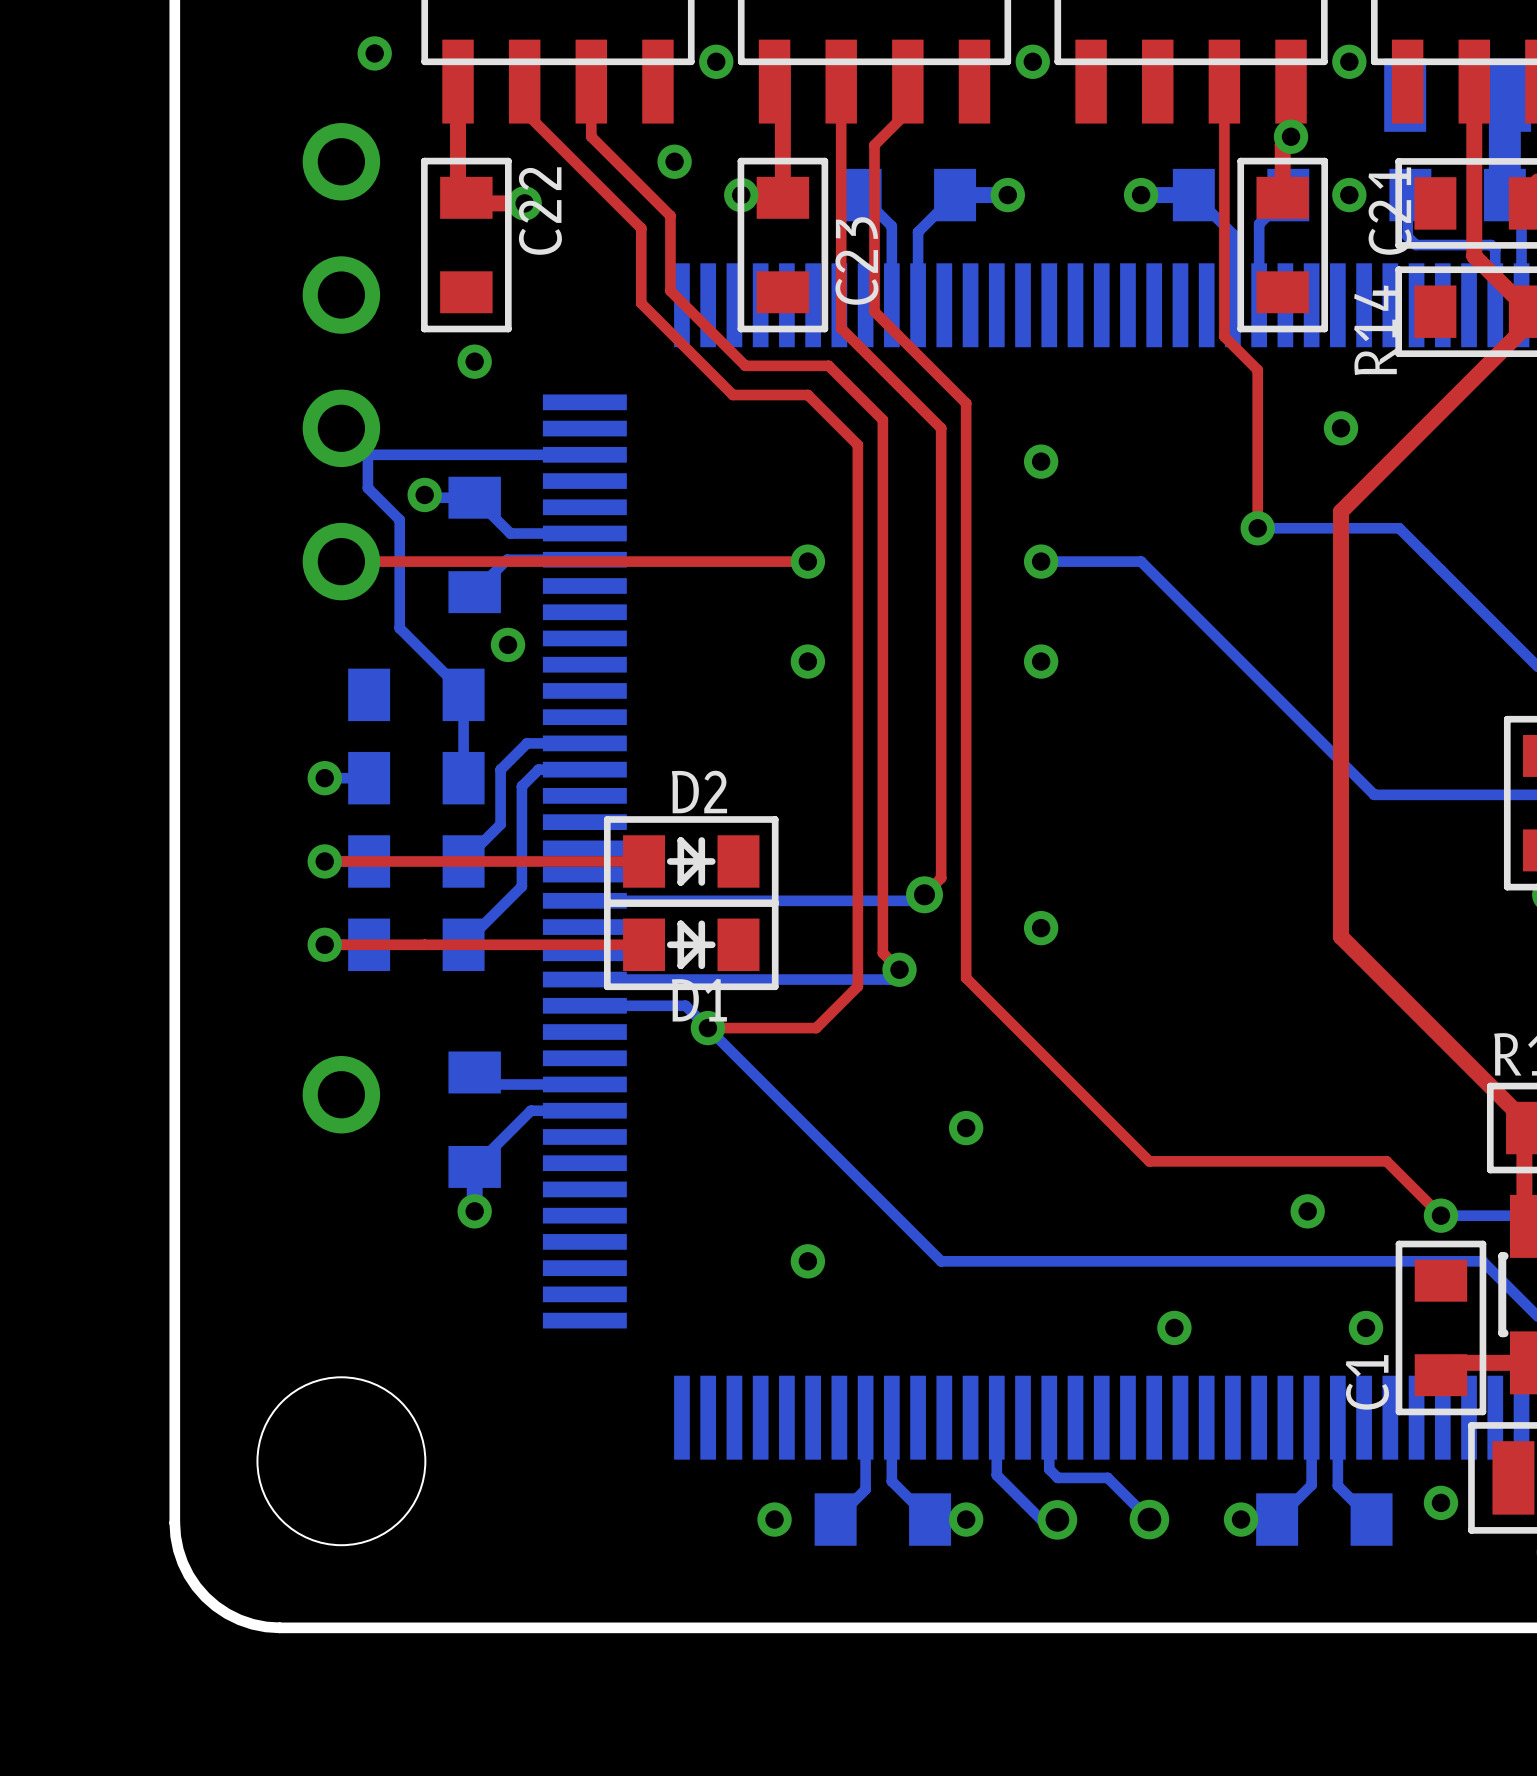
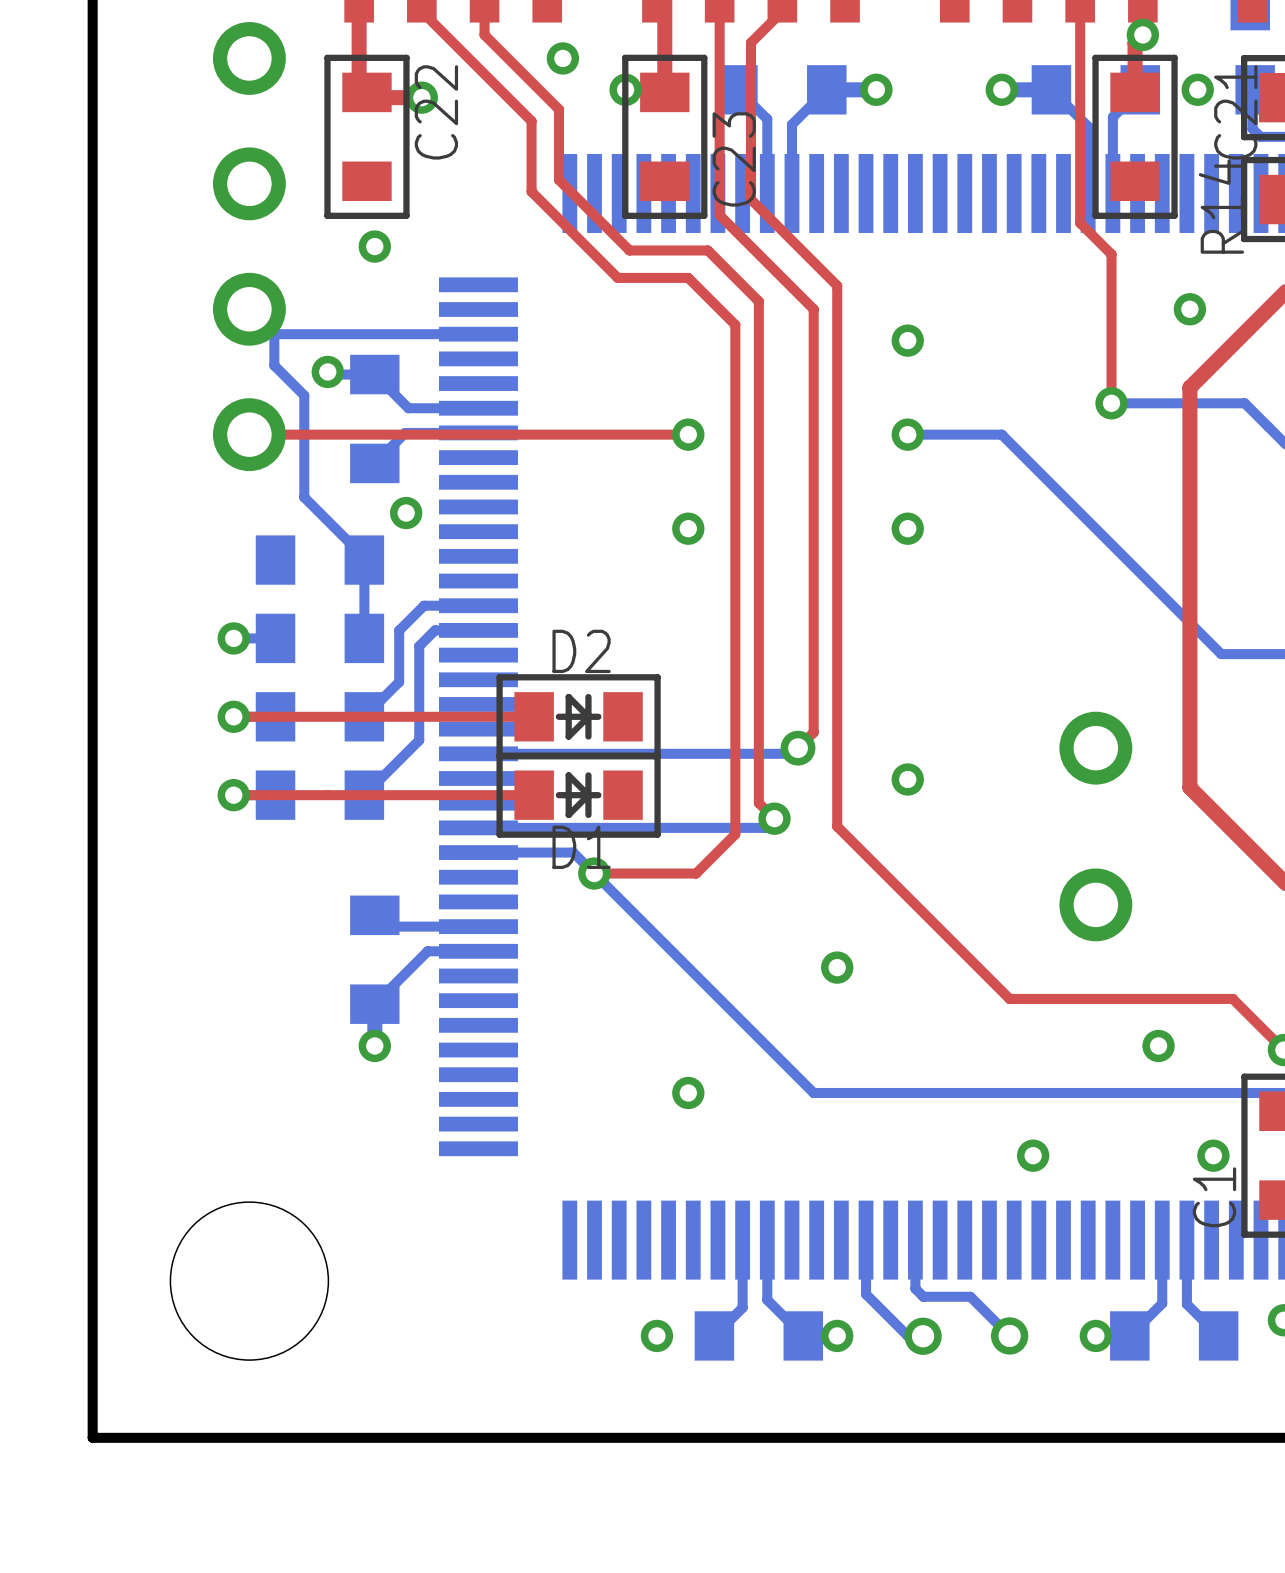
part: none -> (1095, 748)
part: none -> (1095, 904)
part: (341, 1094) -> none
board edge: (174, 1522) (178, 1550) (182, 1563) (188, 1575) (205, 1597) (227, 1613) (239, 1619) (252, 1624) (279, 1627) -> (92, 1339) (92, 1437) (191, 1437)

